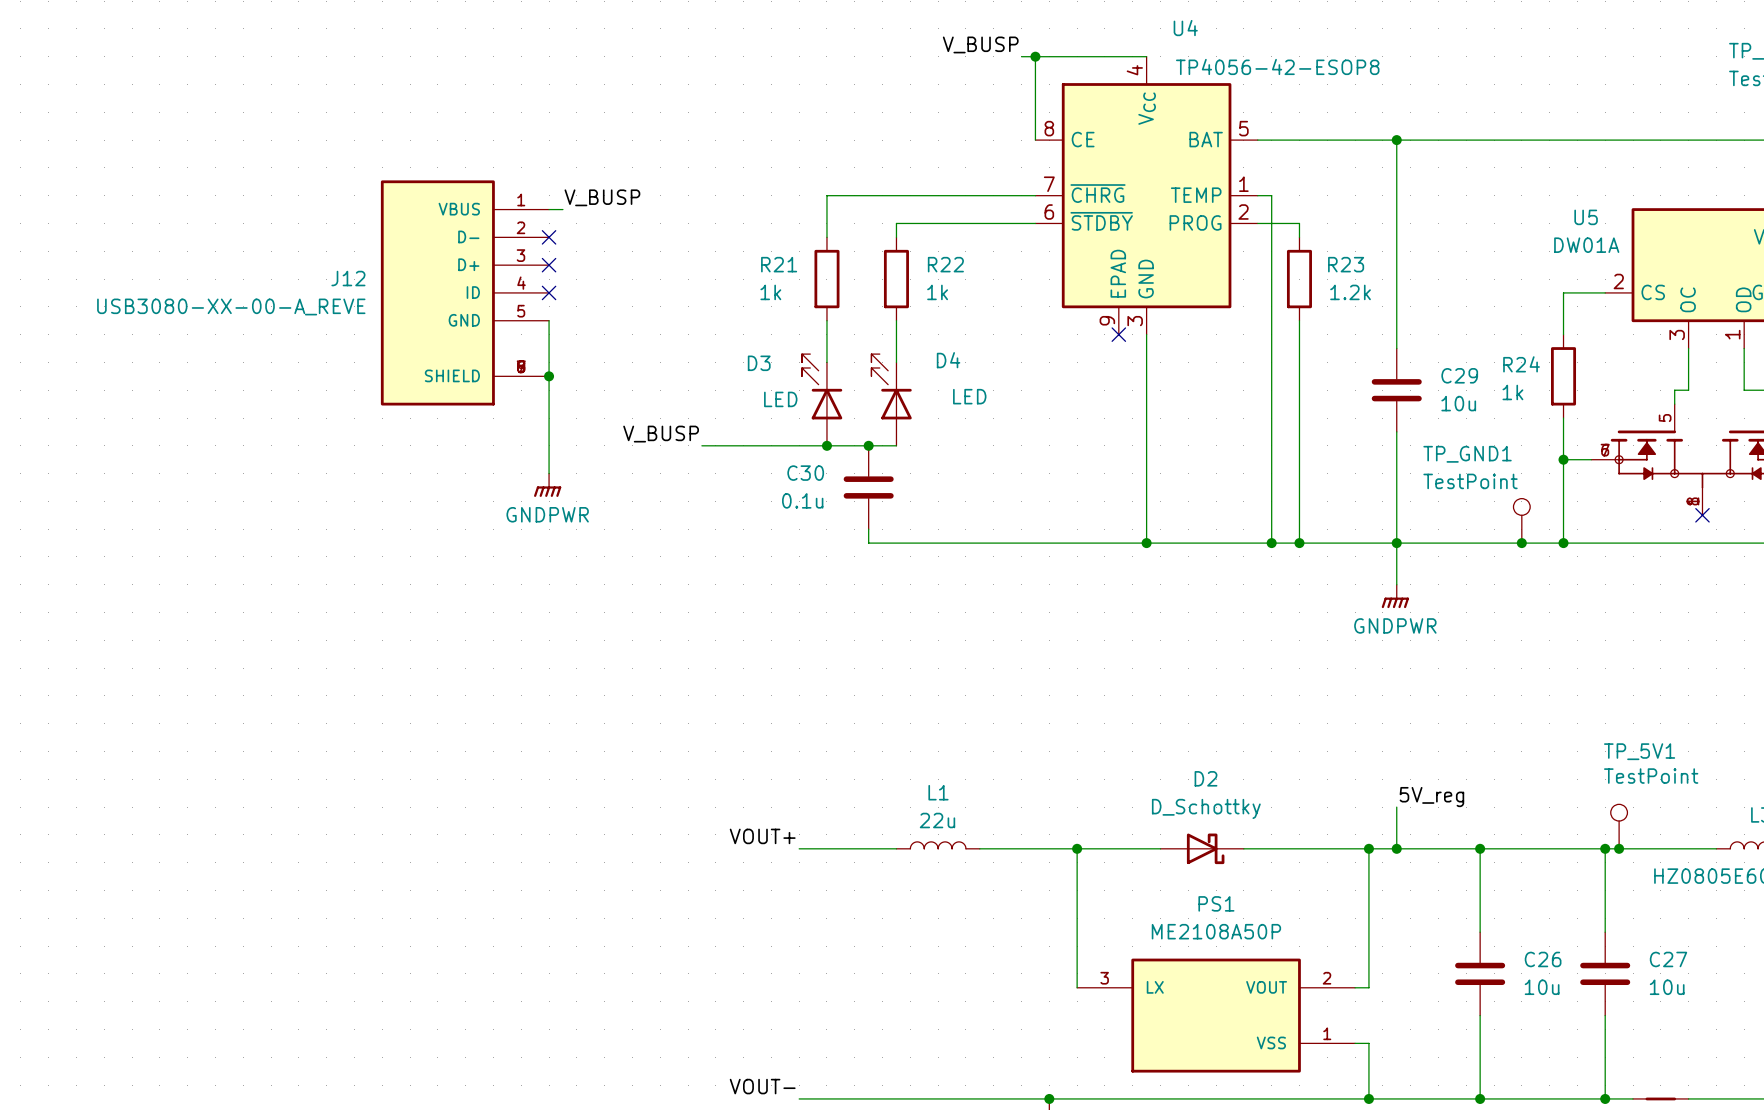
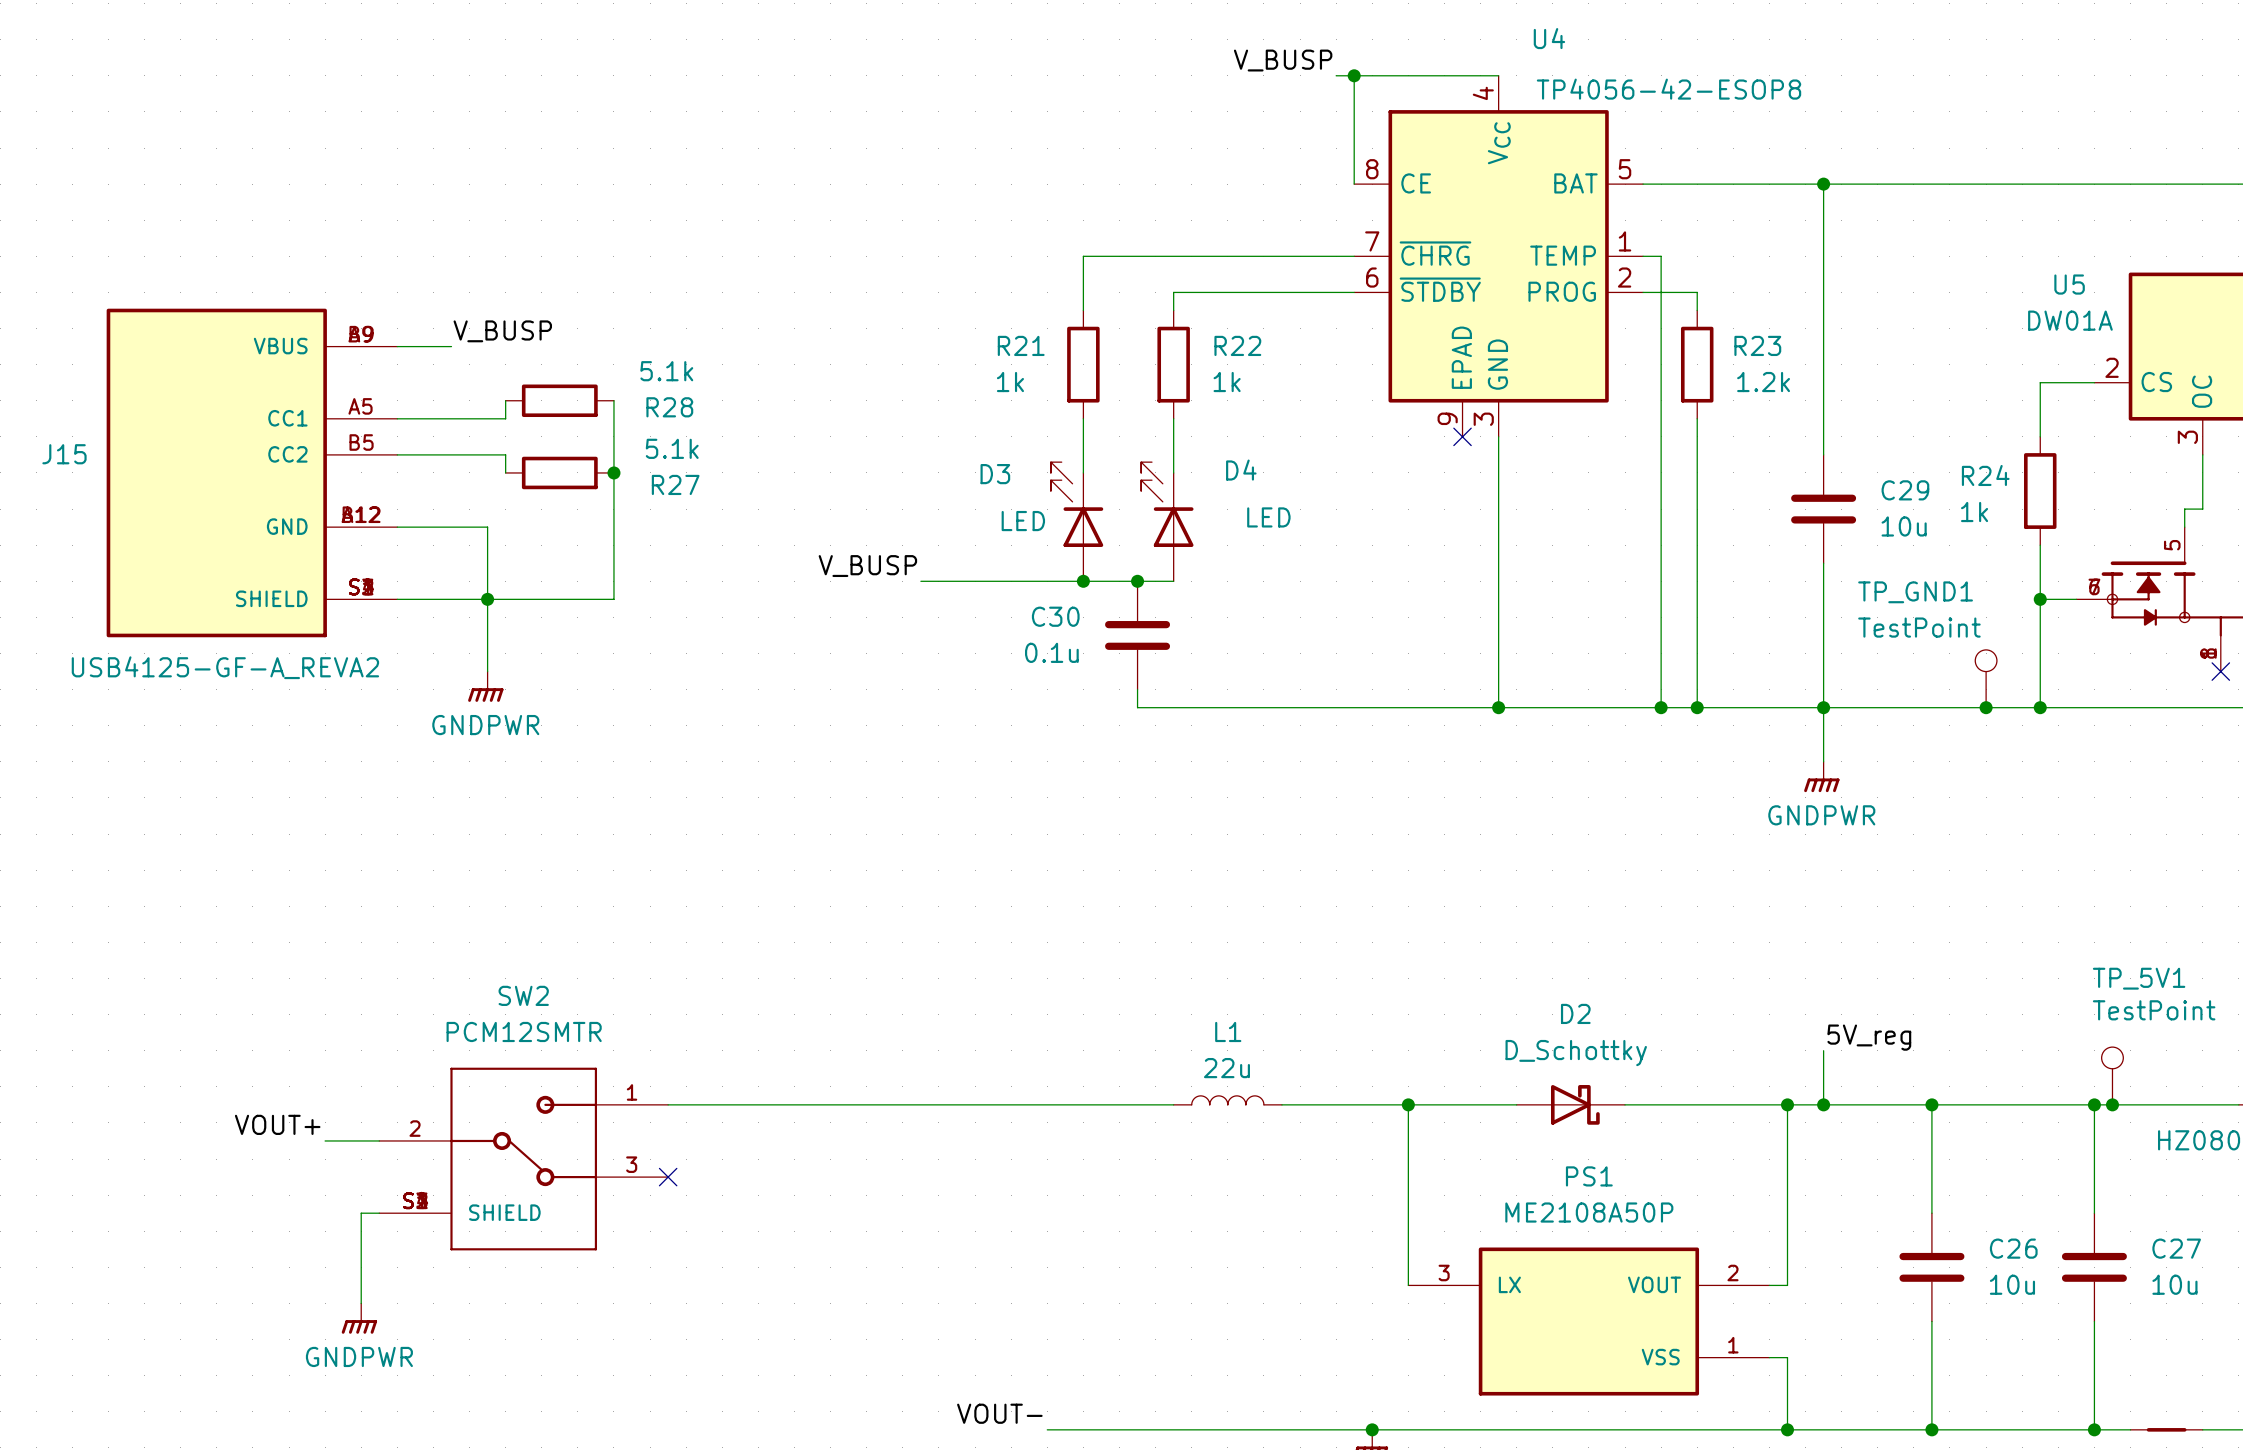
label position: V_BUSP (602, 197) -> V_BUSP (502, 331)
wire: (549, 209) (562, 209) -> none
no-connect mark: (549, 237) -> none
wire: none -> (397, 346) (451, 346)
no-connect mark: (549, 265) -> none
J12: USB3080-XX-00-A_REVE (464, 292) -> none
no-connect mark: (549, 292) -> none
wire: none -> (505, 400) (505, 418) (397, 418)
R28: none -> 5.1k (559, 400)
wire: none -> (613, 400) (613, 599) (397, 599)
wire: (549, 320) (549, 473) -> none
wire: none -> (397, 454) (505, 454) (505, 472)
J15: none -> USB4125-GF-A_REVA2 (251, 472)
R27: none -> 5.1k (559, 472)
junction: none -> (613, 472)
junction: (549, 376) -> none
wire: none -> (397, 527) (487, 527) (487, 671)
junction: none -> (487, 599)
power symbol position: GNDPWR (547, 485) -> GNDPWR (485, 686)
label: VOUT+ (762, 836) -> none
wire: none -> (668, 1104) (1047, 1104)
label: none -> VOUT+ (277, 1124)
wire: none -> (325, 1140) (379, 1140)
SW2: none -> PCM12SMTR (523, 1159)
no-connect mark: none -> (668, 1177)
wire: none -> (379, 1213) (361, 1213) (361, 1303)
power symbol: none -> GNDPWR (359, 1318)

